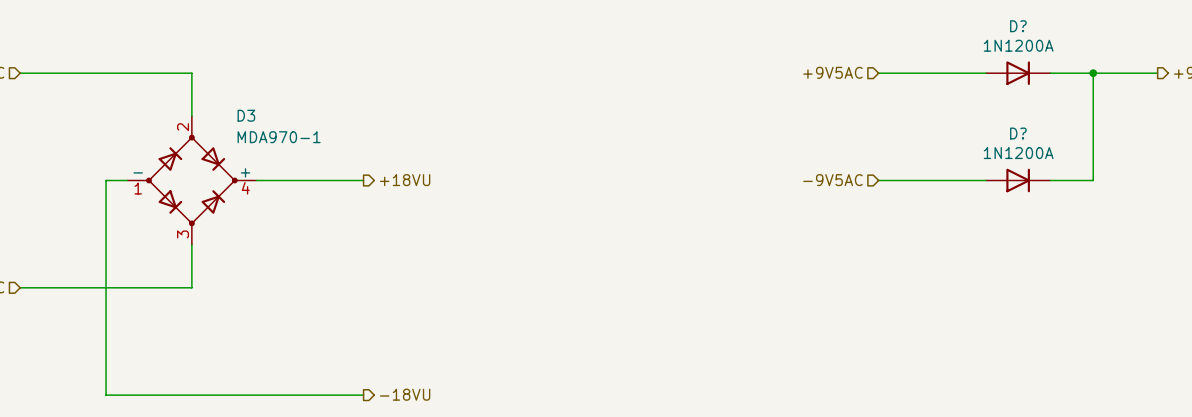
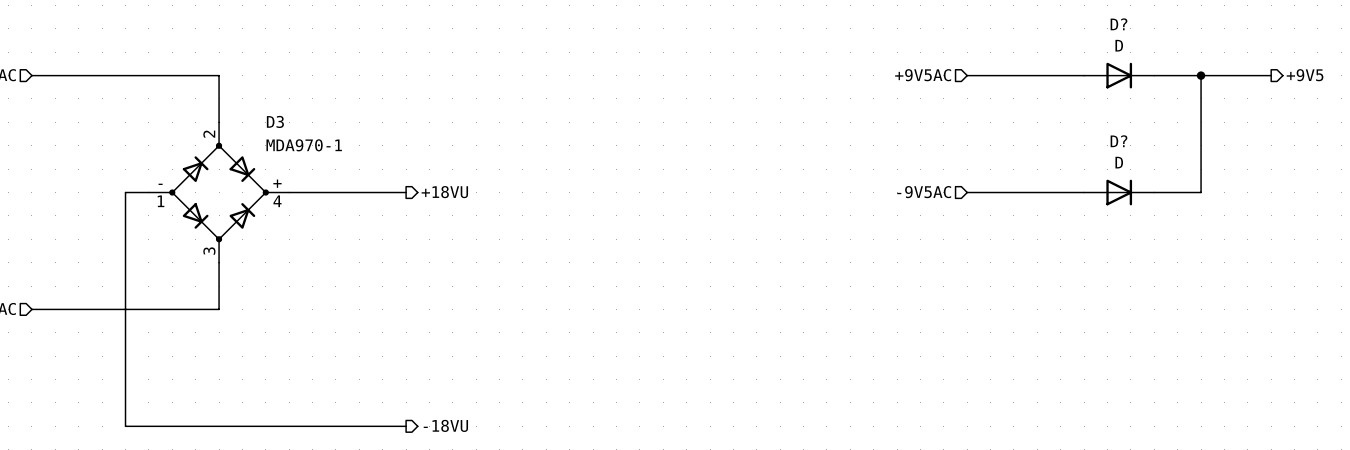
D? value: 1N1200A (1018, 45) -> D (1119, 45)
D? value: 1N1200A (1018, 153) -> D (1119, 162)

